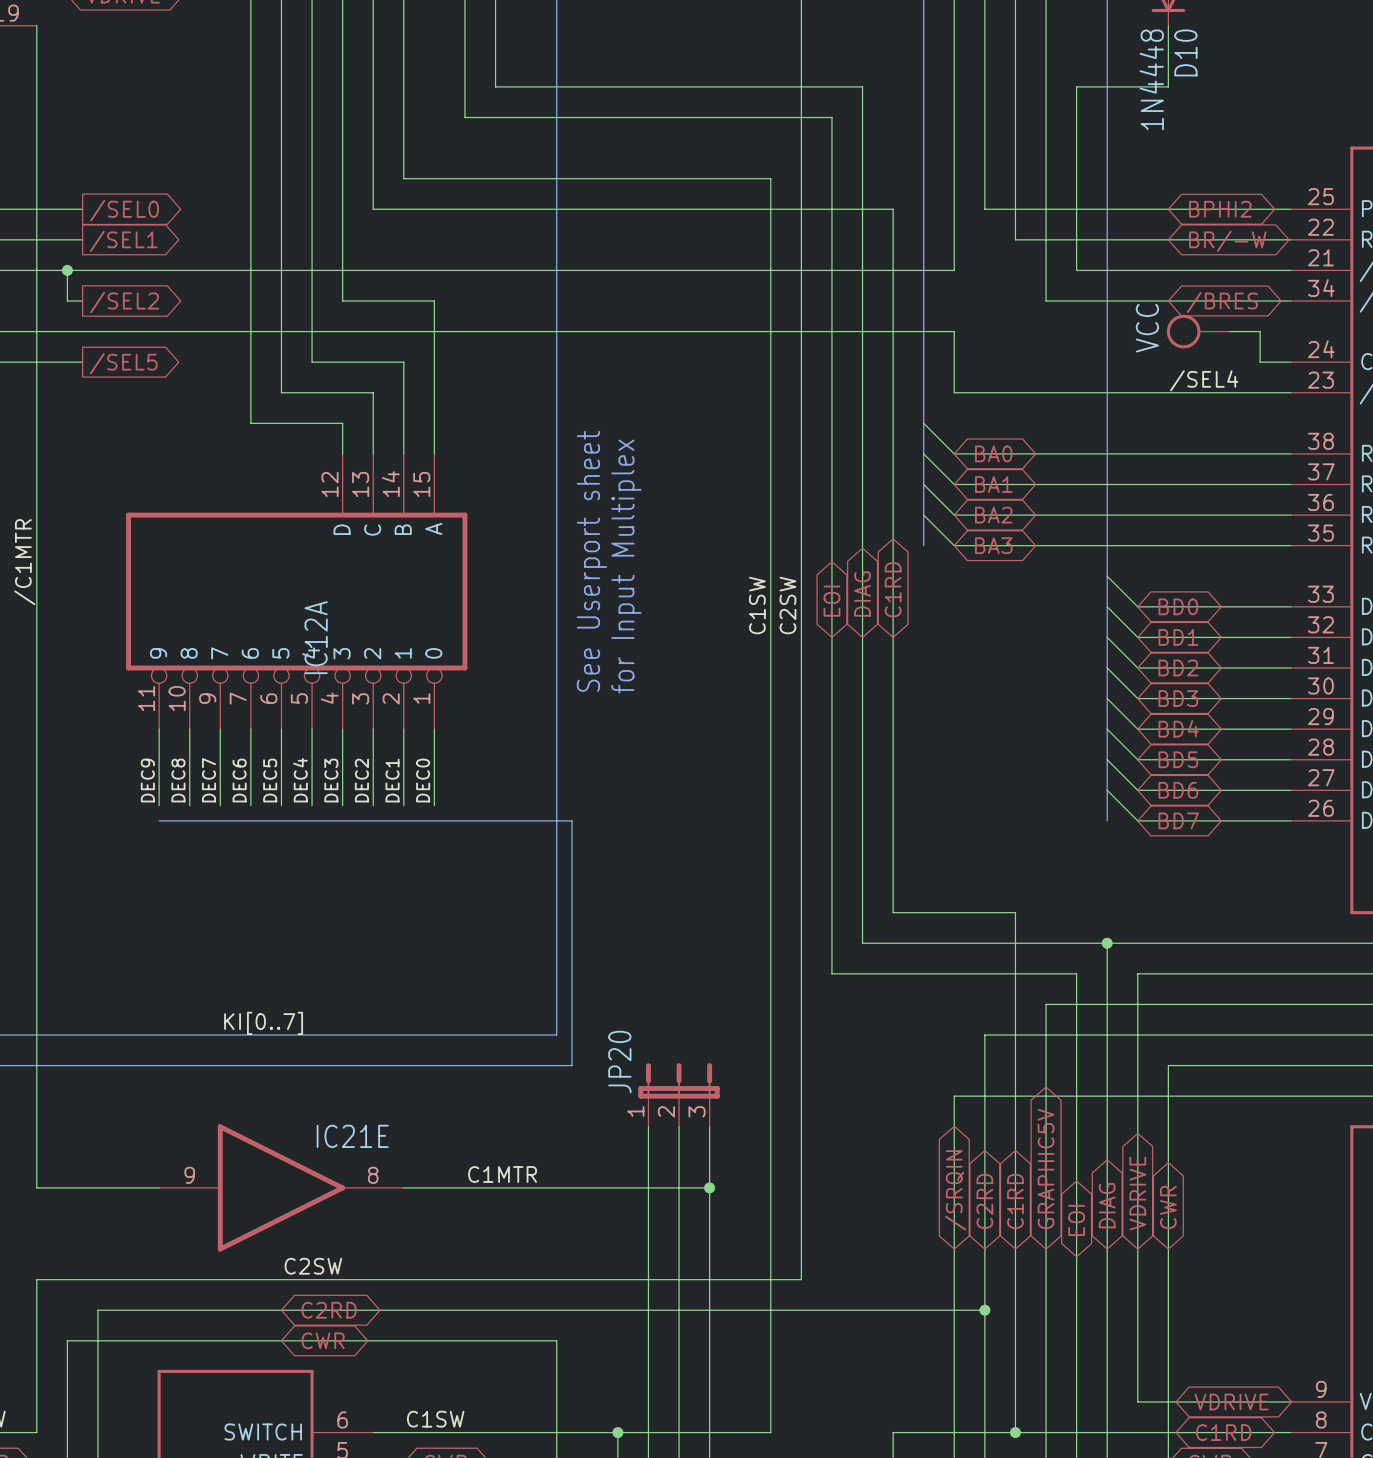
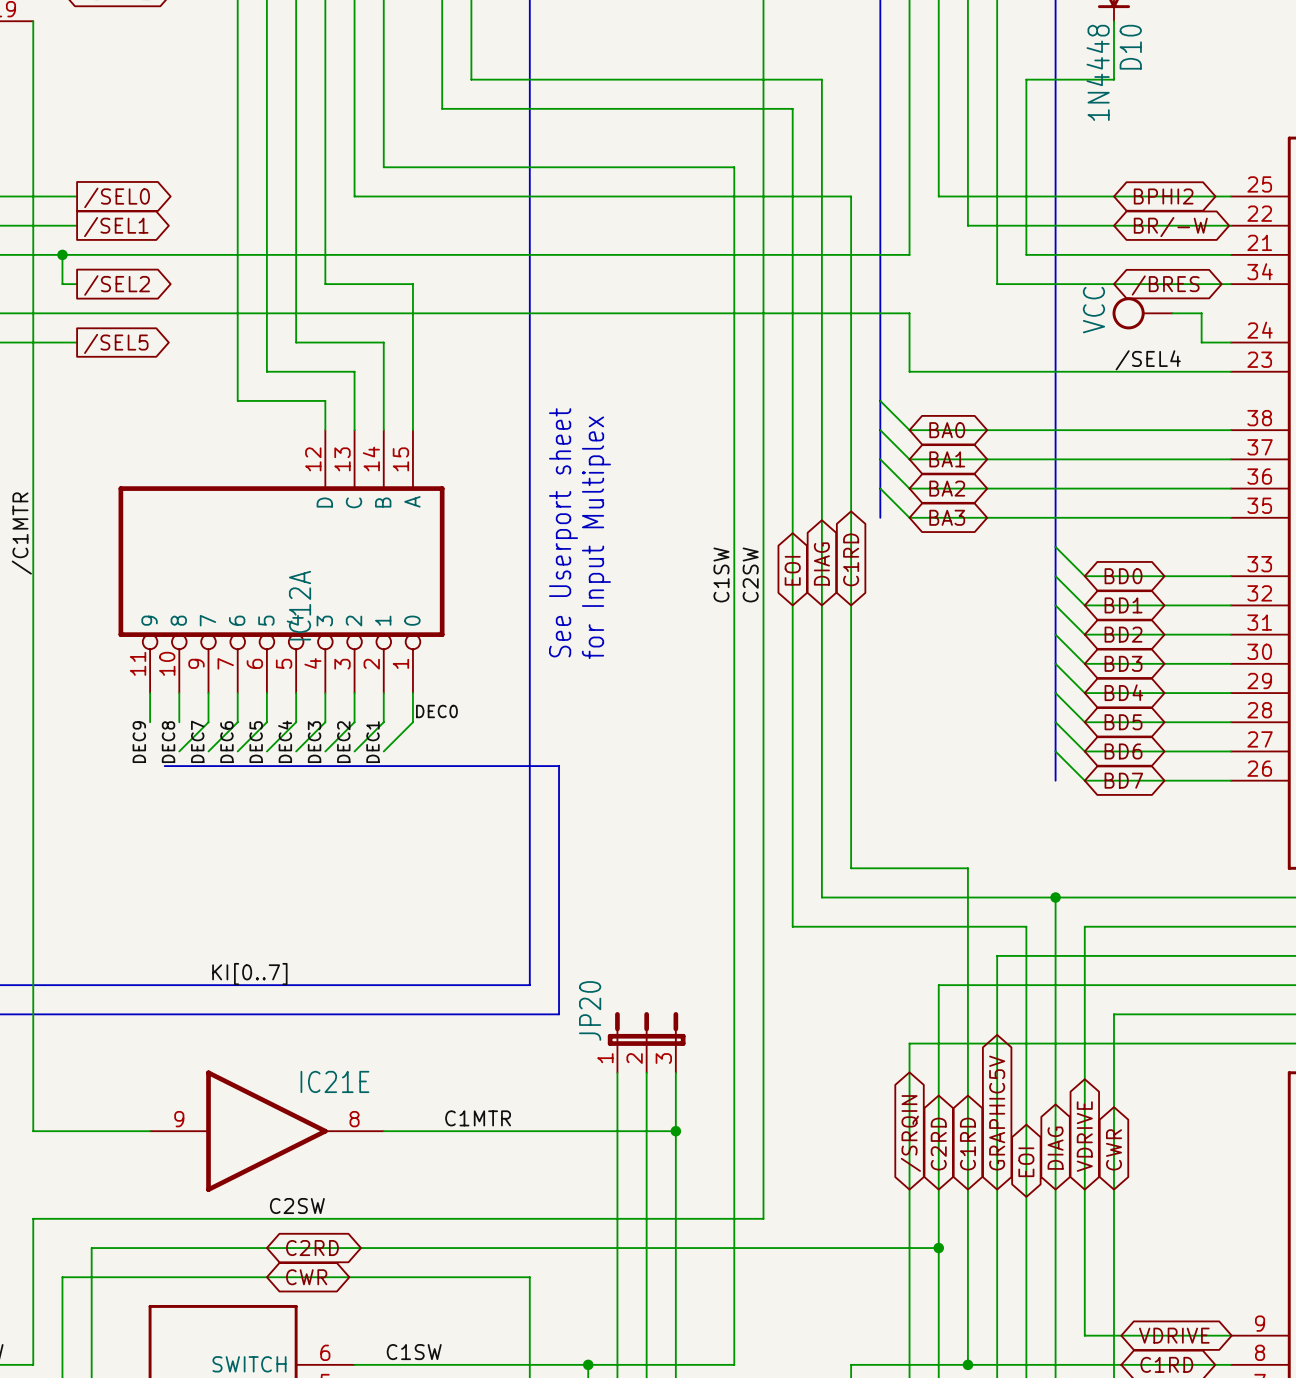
wire: (159, 759) (159, 805) -> none
wire: (189, 759) (189, 805) -> none
wire: (220, 759) (220, 805) -> (208, 722) (179, 751)
wire: (250, 759) (250, 805) -> (237, 722) (208, 751)
wire: (281, 759) (281, 805) -> (266, 722) (237, 751)
wire: (312, 759) (312, 805) -> (296, 722) (266, 751)
wire: (342, 759) (342, 805) -> (325, 722) (296, 751)
wire: (373, 759) (373, 805) -> (354, 722) (325, 751)
wire: (403, 759) (403, 805) -> (383, 722) (354, 751)
wire: (434, 759) (434, 805) -> (412, 722) (383, 751)
label rotation: 0° (423, 780) -> 90° clockwise (436, 711)
bus: (159, 820) (572, 820) (572, 1065) -> (164, 766) (559, 766) (559, 1014) (544, 1014)

